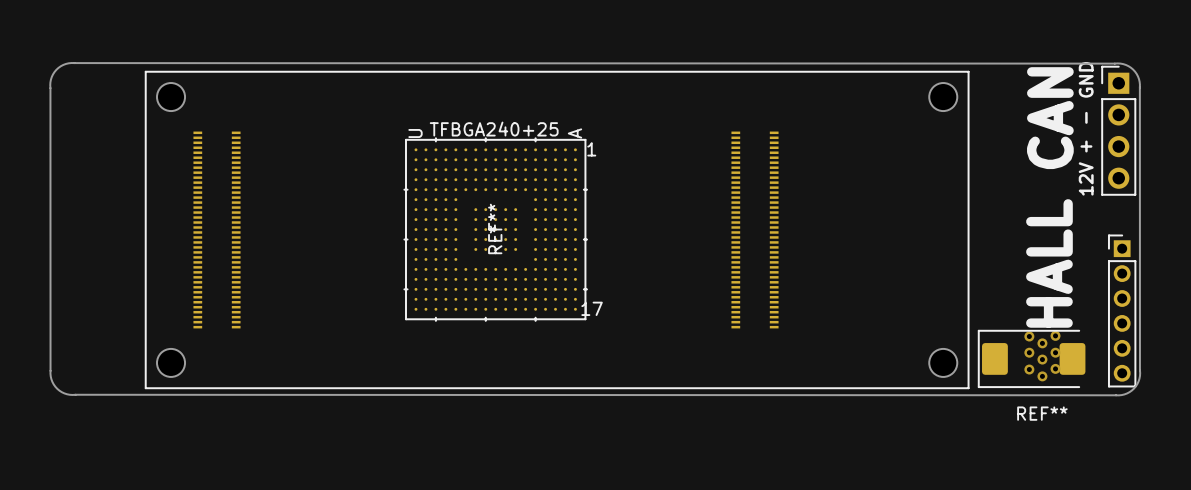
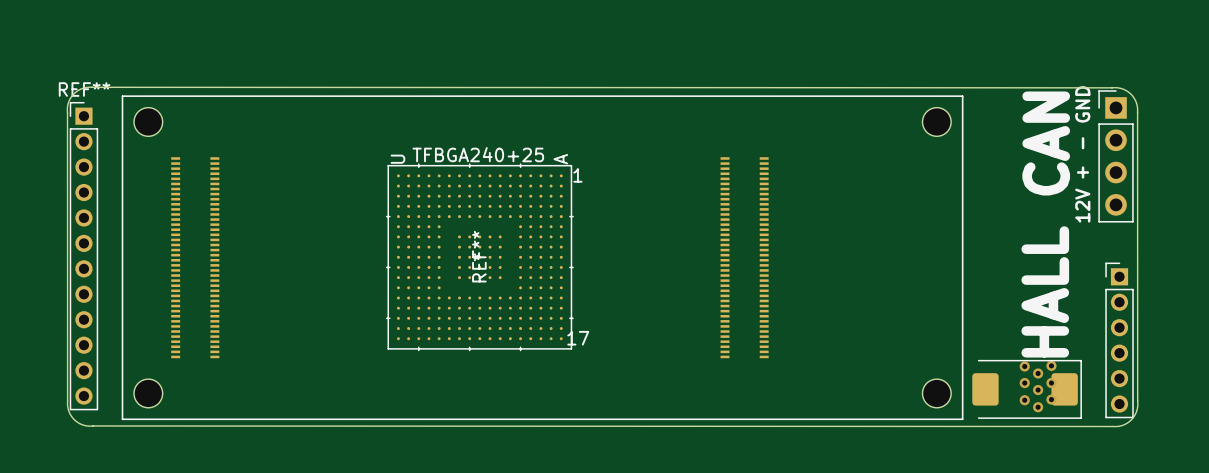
board edge: (1114, 63) (65, 63) (54, 72) (50, 85) (50, 373) (52, 381) (57, 388) (64, 393) (72, 394) (1116, 395) -> (1112, 87) (83, 88) (71, 96) (67, 109) (67, 404) (69, 412) (74, 419) (81, 424) (90, 426) (1113, 426)
REF**: none -> (83, 256)
REF**: (1031, 358) -> none
part: none -> (1027, 389)

